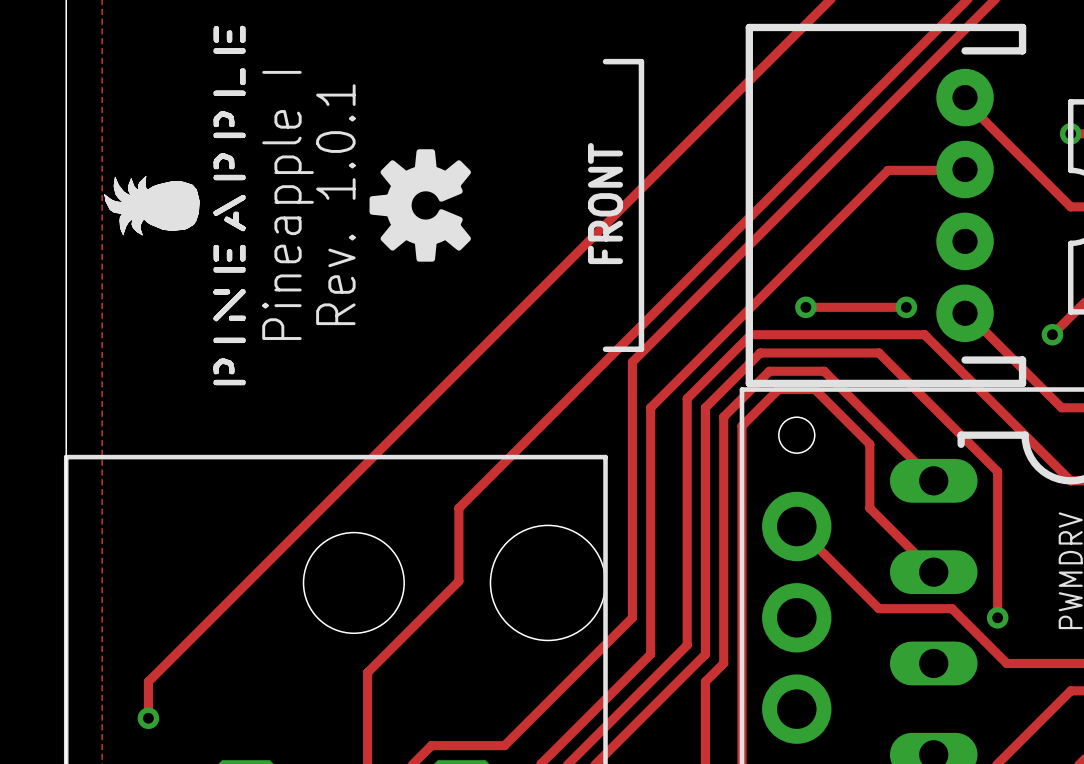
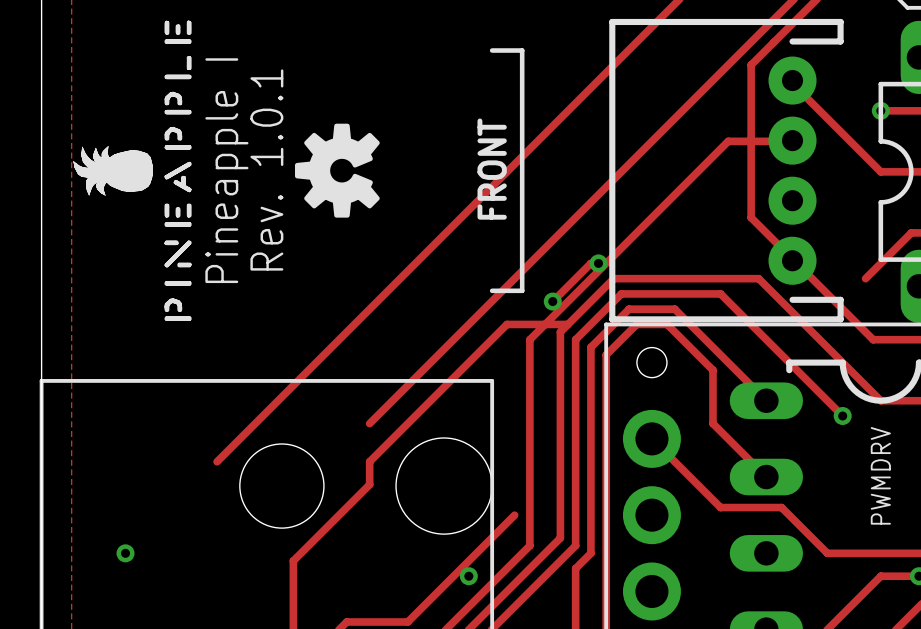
track: (915, 79) (632, 362) (632, 617) -> (751, 65) (751, 217) (792, 260)
track: (805, 307) (906, 307) -> none
via: (805, 307) -> none
via: (906, 307) -> none
track: none -> (598, 263) (590, 263) (552, 301)
via: none -> (598, 263)
via: (1052, 334) -> none
via: none -> (552, 301)
track: (997, 471) (997, 617) -> (819, 393) (842, 416)
via: none -> (842, 416)
track: (458, 508) (458, 553) -> (568, 324) (506, 324) (369, 461)
track: (276, 553) (148, 681) (148, 718) -> none
via: (997, 617) -> none
via: none -> (468, 576)
via position: (148, 718) -> (125, 553)

